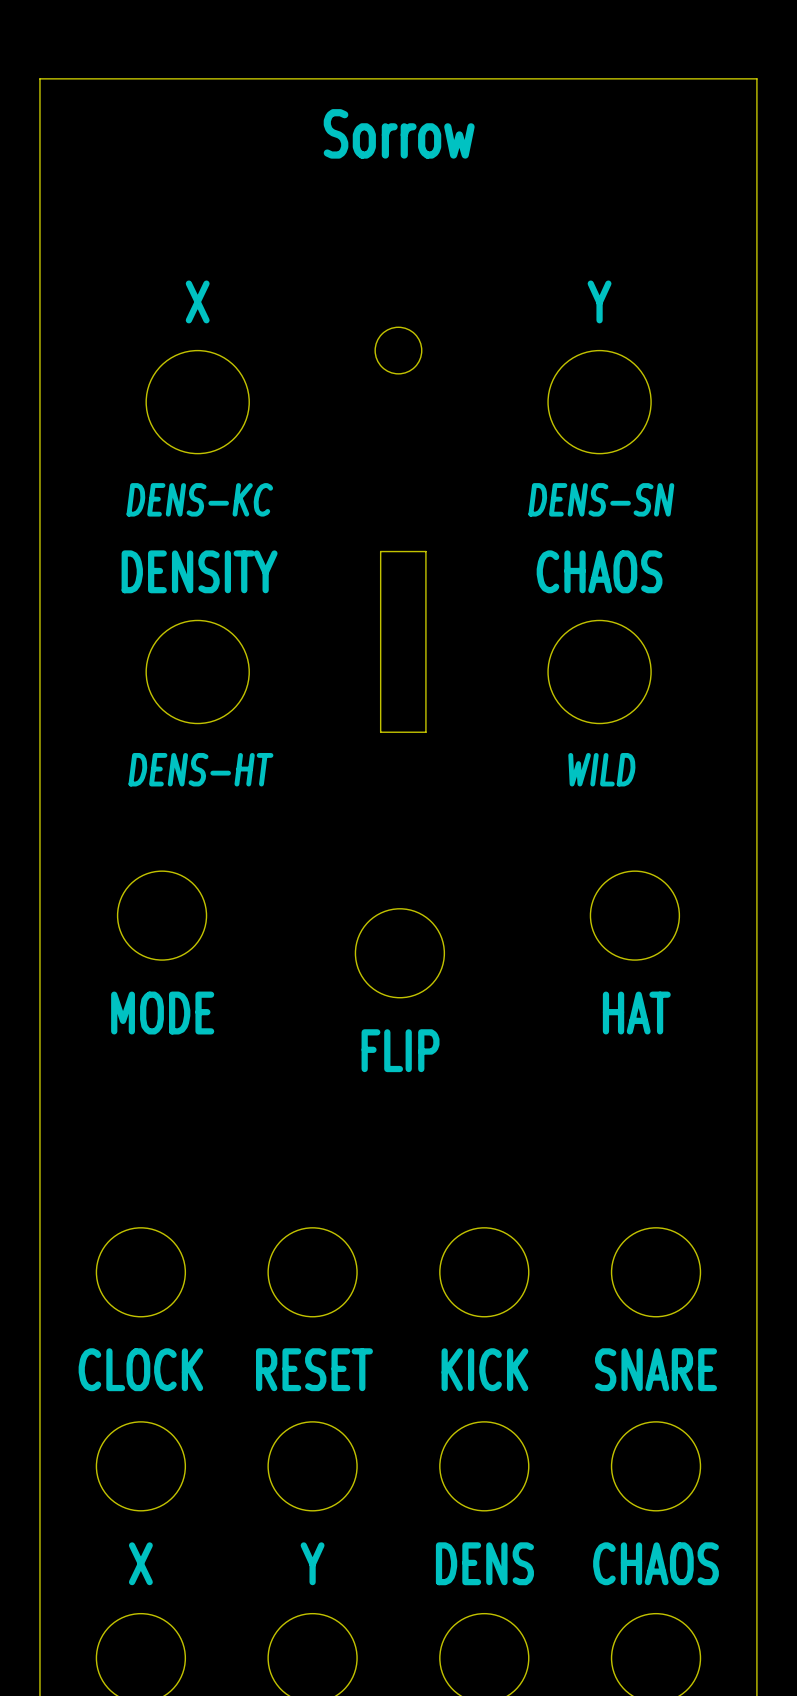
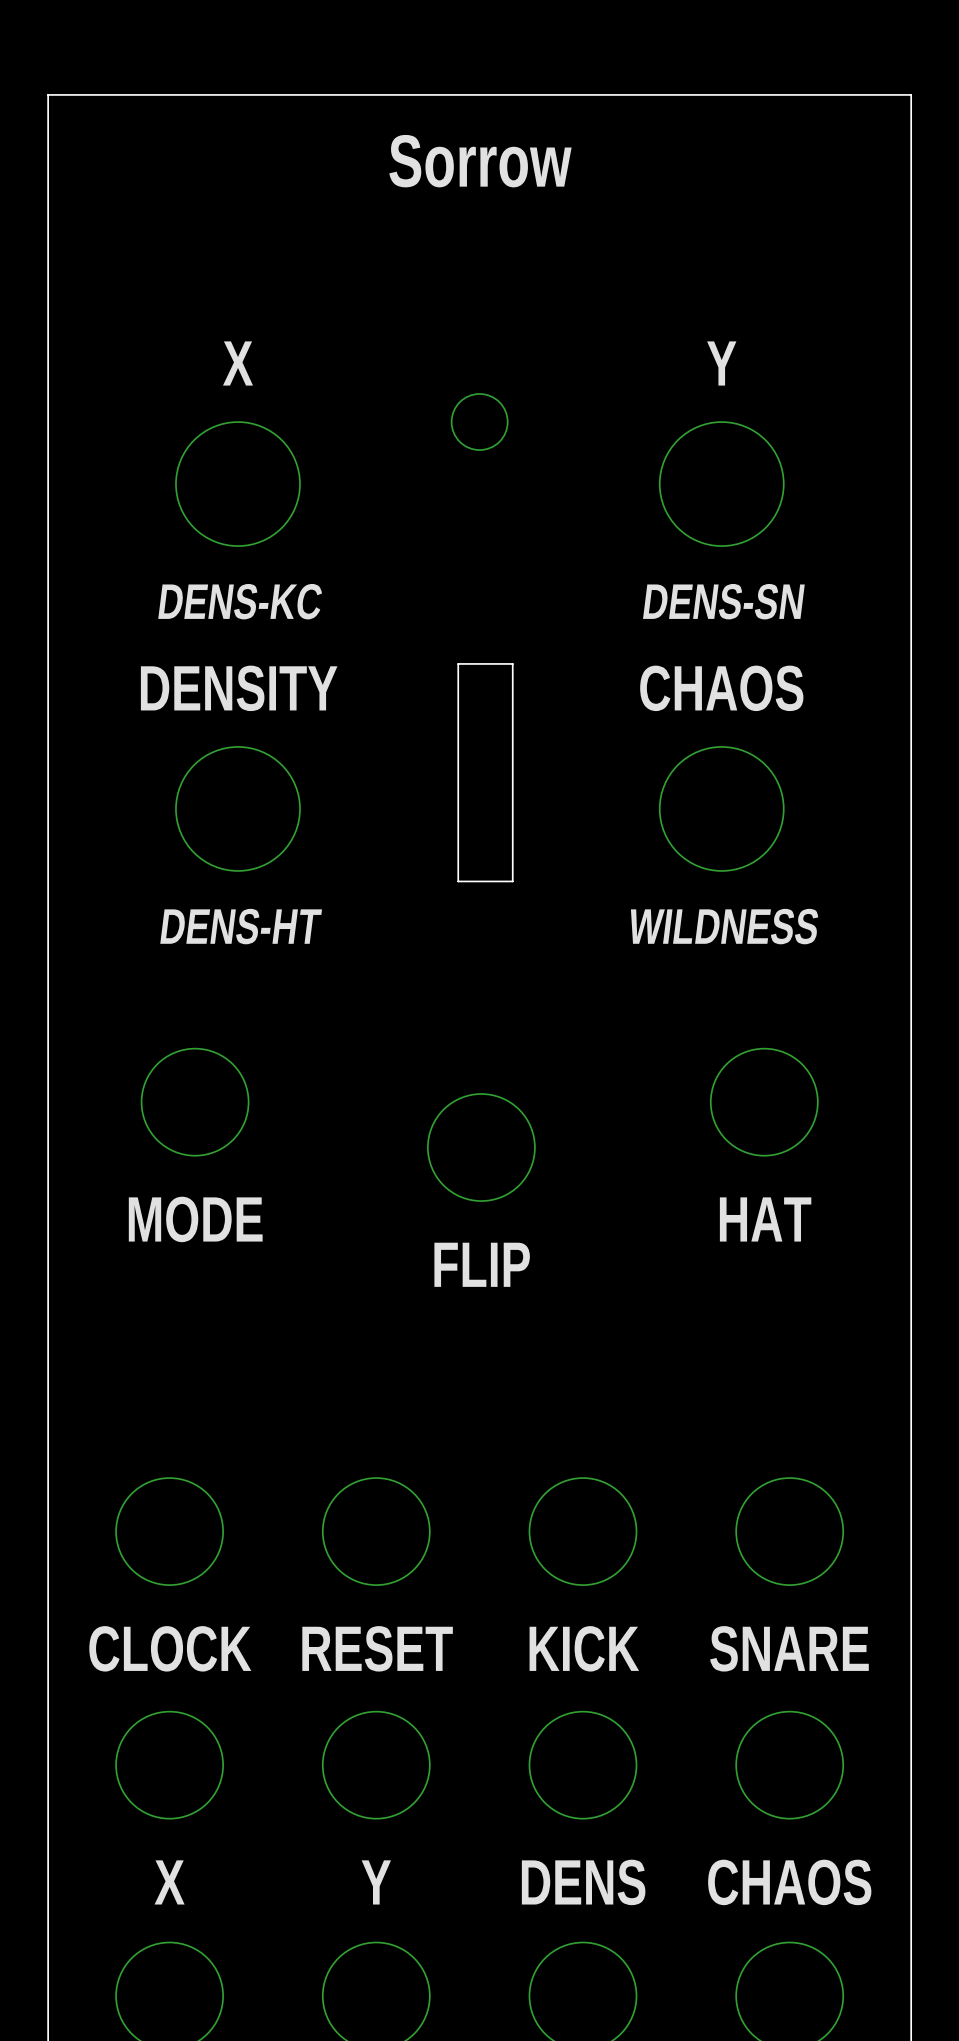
text: WILD (601, 769) -> WILDNESS (724, 926)

